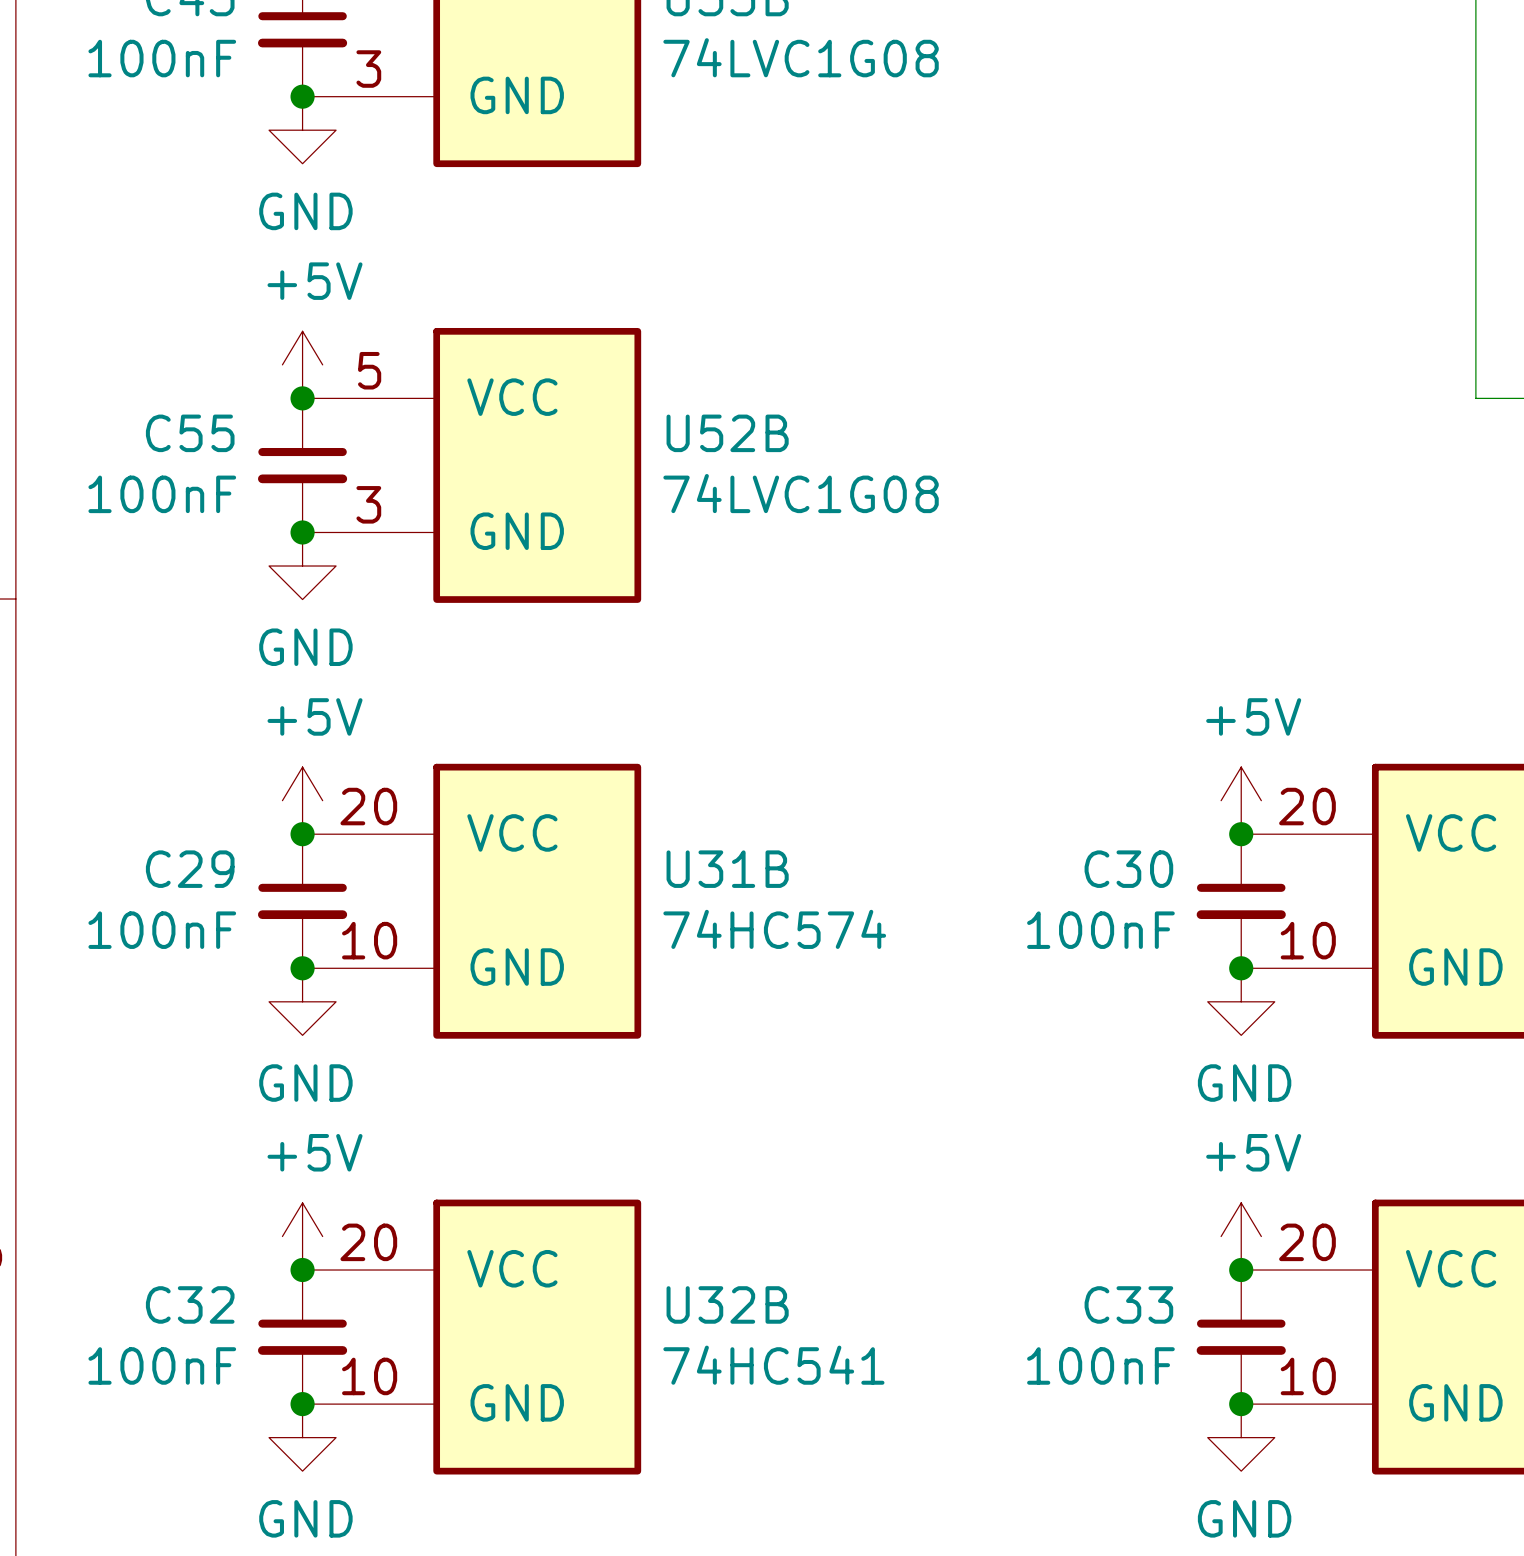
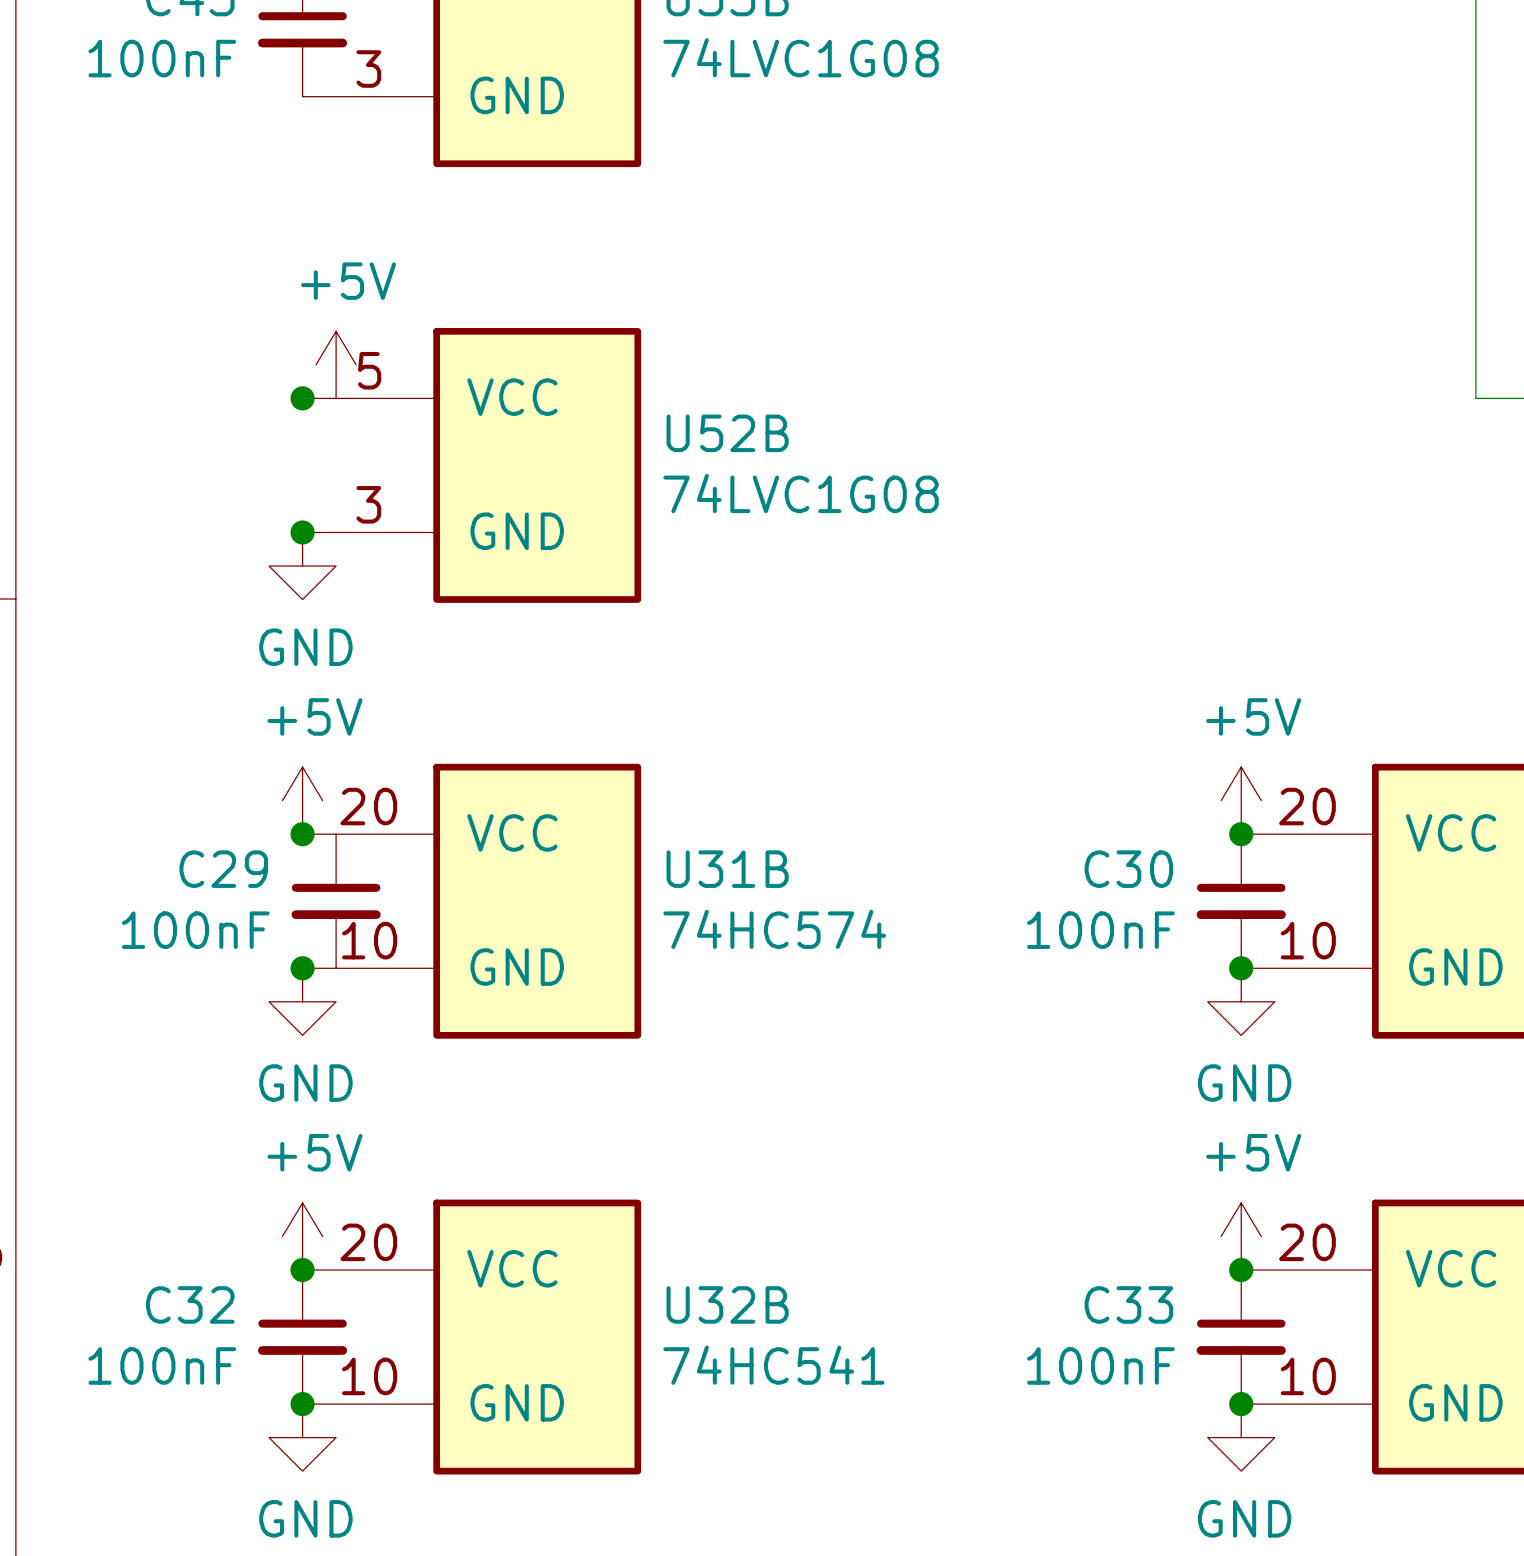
junction: (302, 96) -> none
power symbol: GND (302, 130) -> none
power symbol position: +5V (302, 364) -> +5V (336, 364)
C55: 100nF (302, 465) -> none
C29 position: (302, 901) -> (336, 901)

